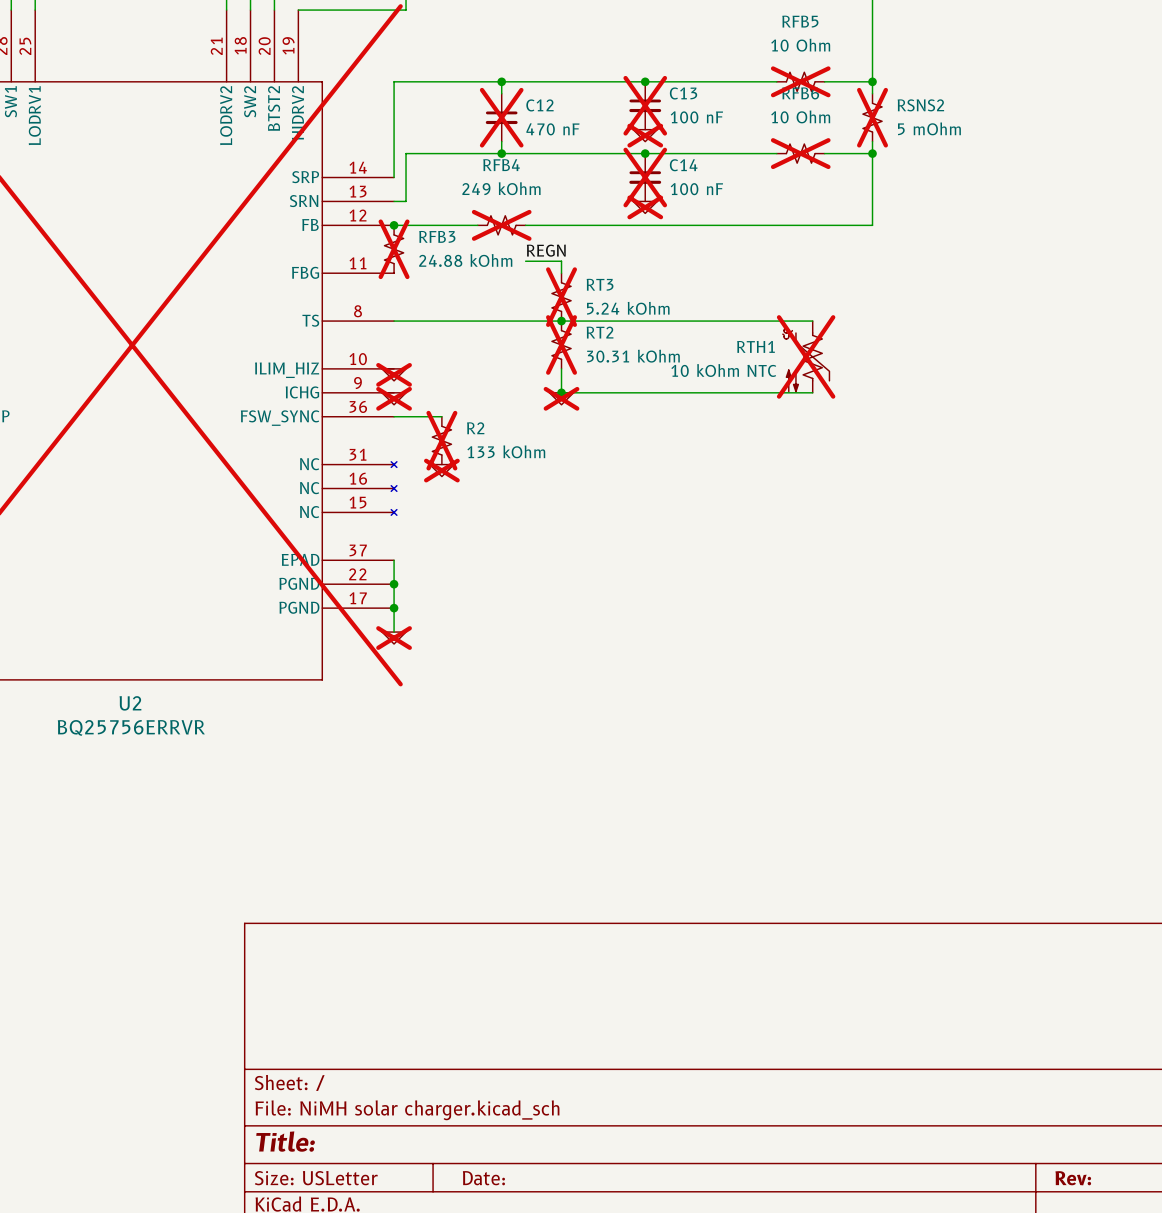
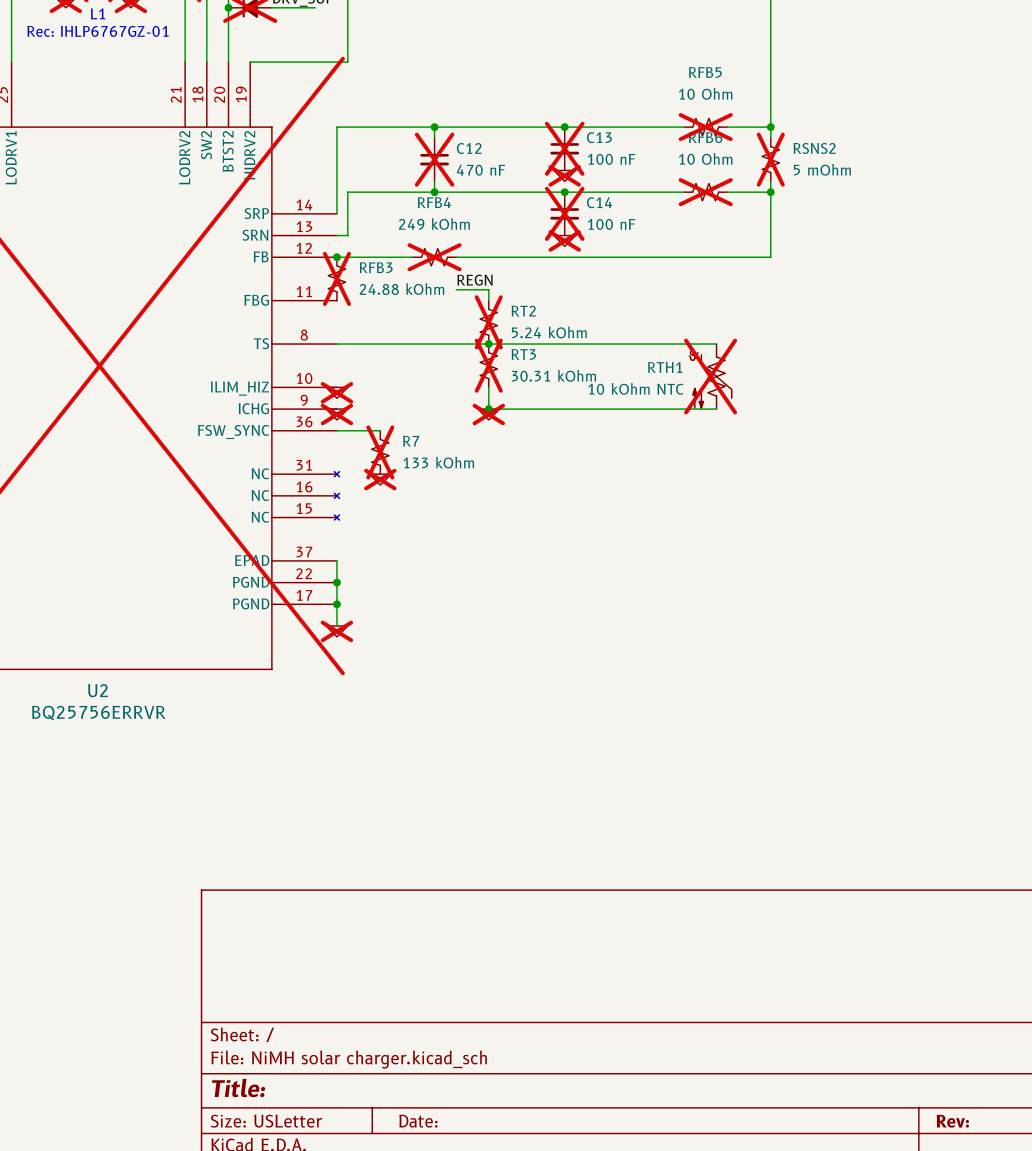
RT3 name: RT3 (600, 284) -> RT2 (523, 311)
RT2 name: RT2 (600, 332) -> RT3 (523, 354)
R2 name: R2 (475, 428) -> R7 (411, 441)

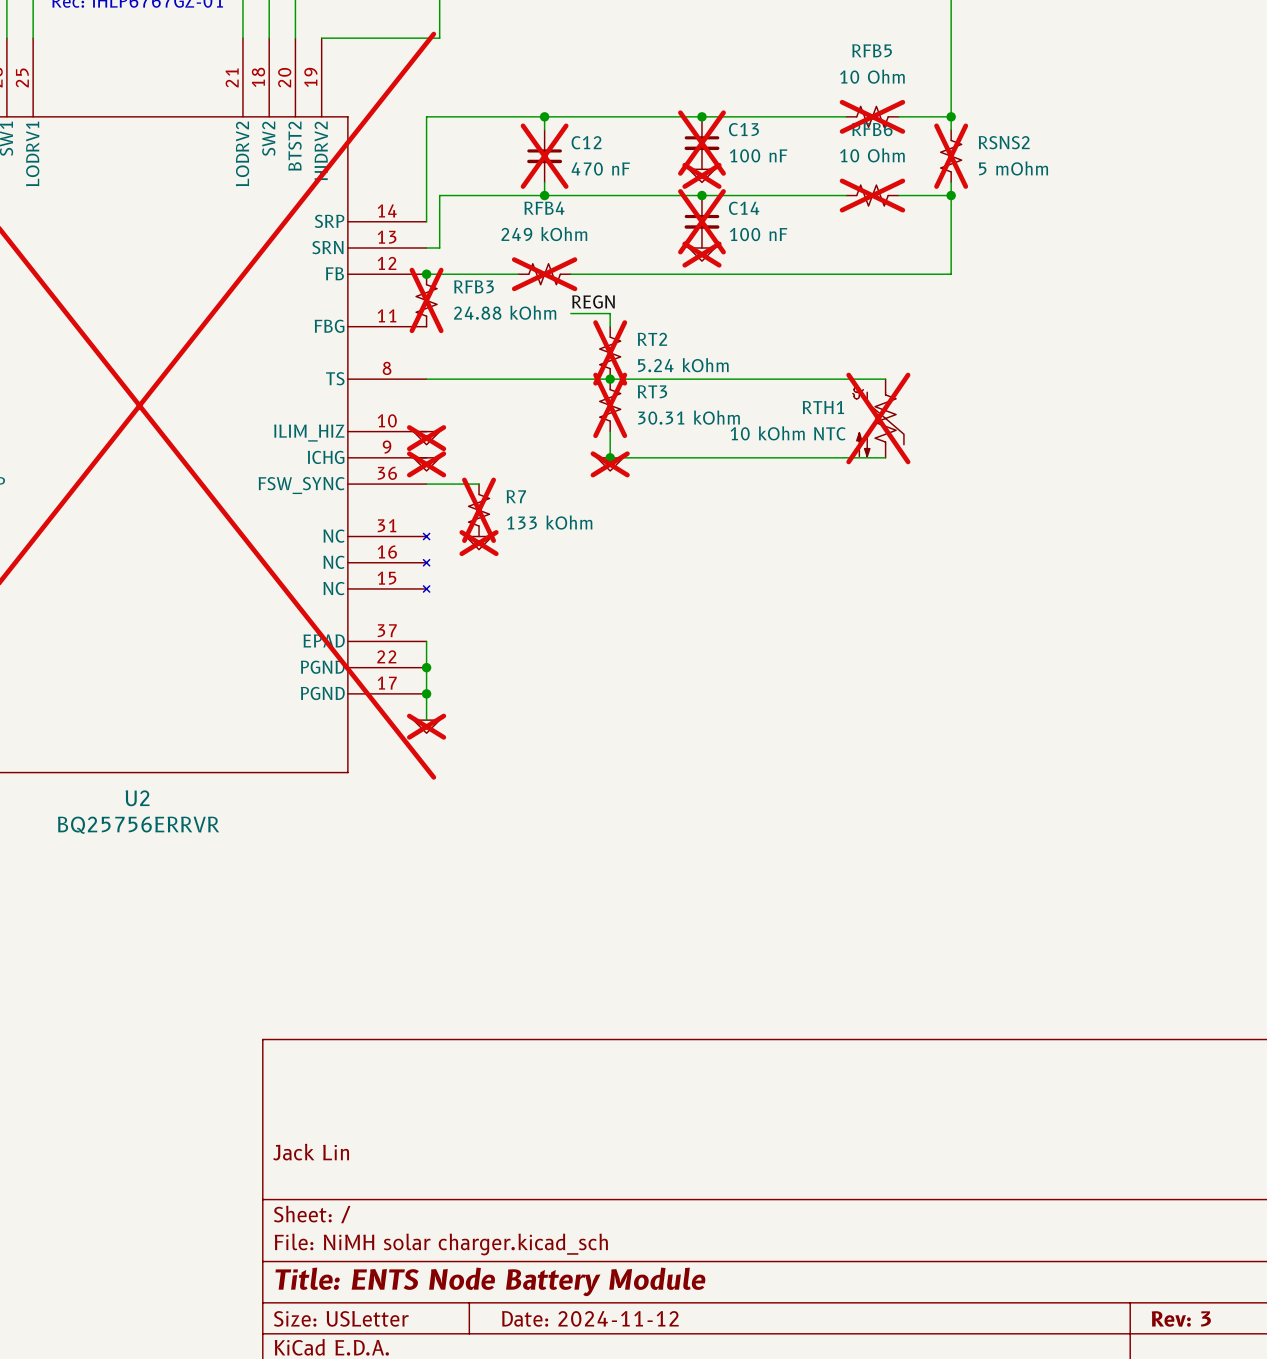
title block: none -> Jack Lin (311, 1152)
title block: Title: (238, 1087) -> Title: ENTS Node Battery Module (490, 1281)
title block: Date: (418, 1121) -> Date: 2024-11-12 (590, 1318)
title block: Rev: (952, 1121) -> Rev: 3 (1181, 1318)

